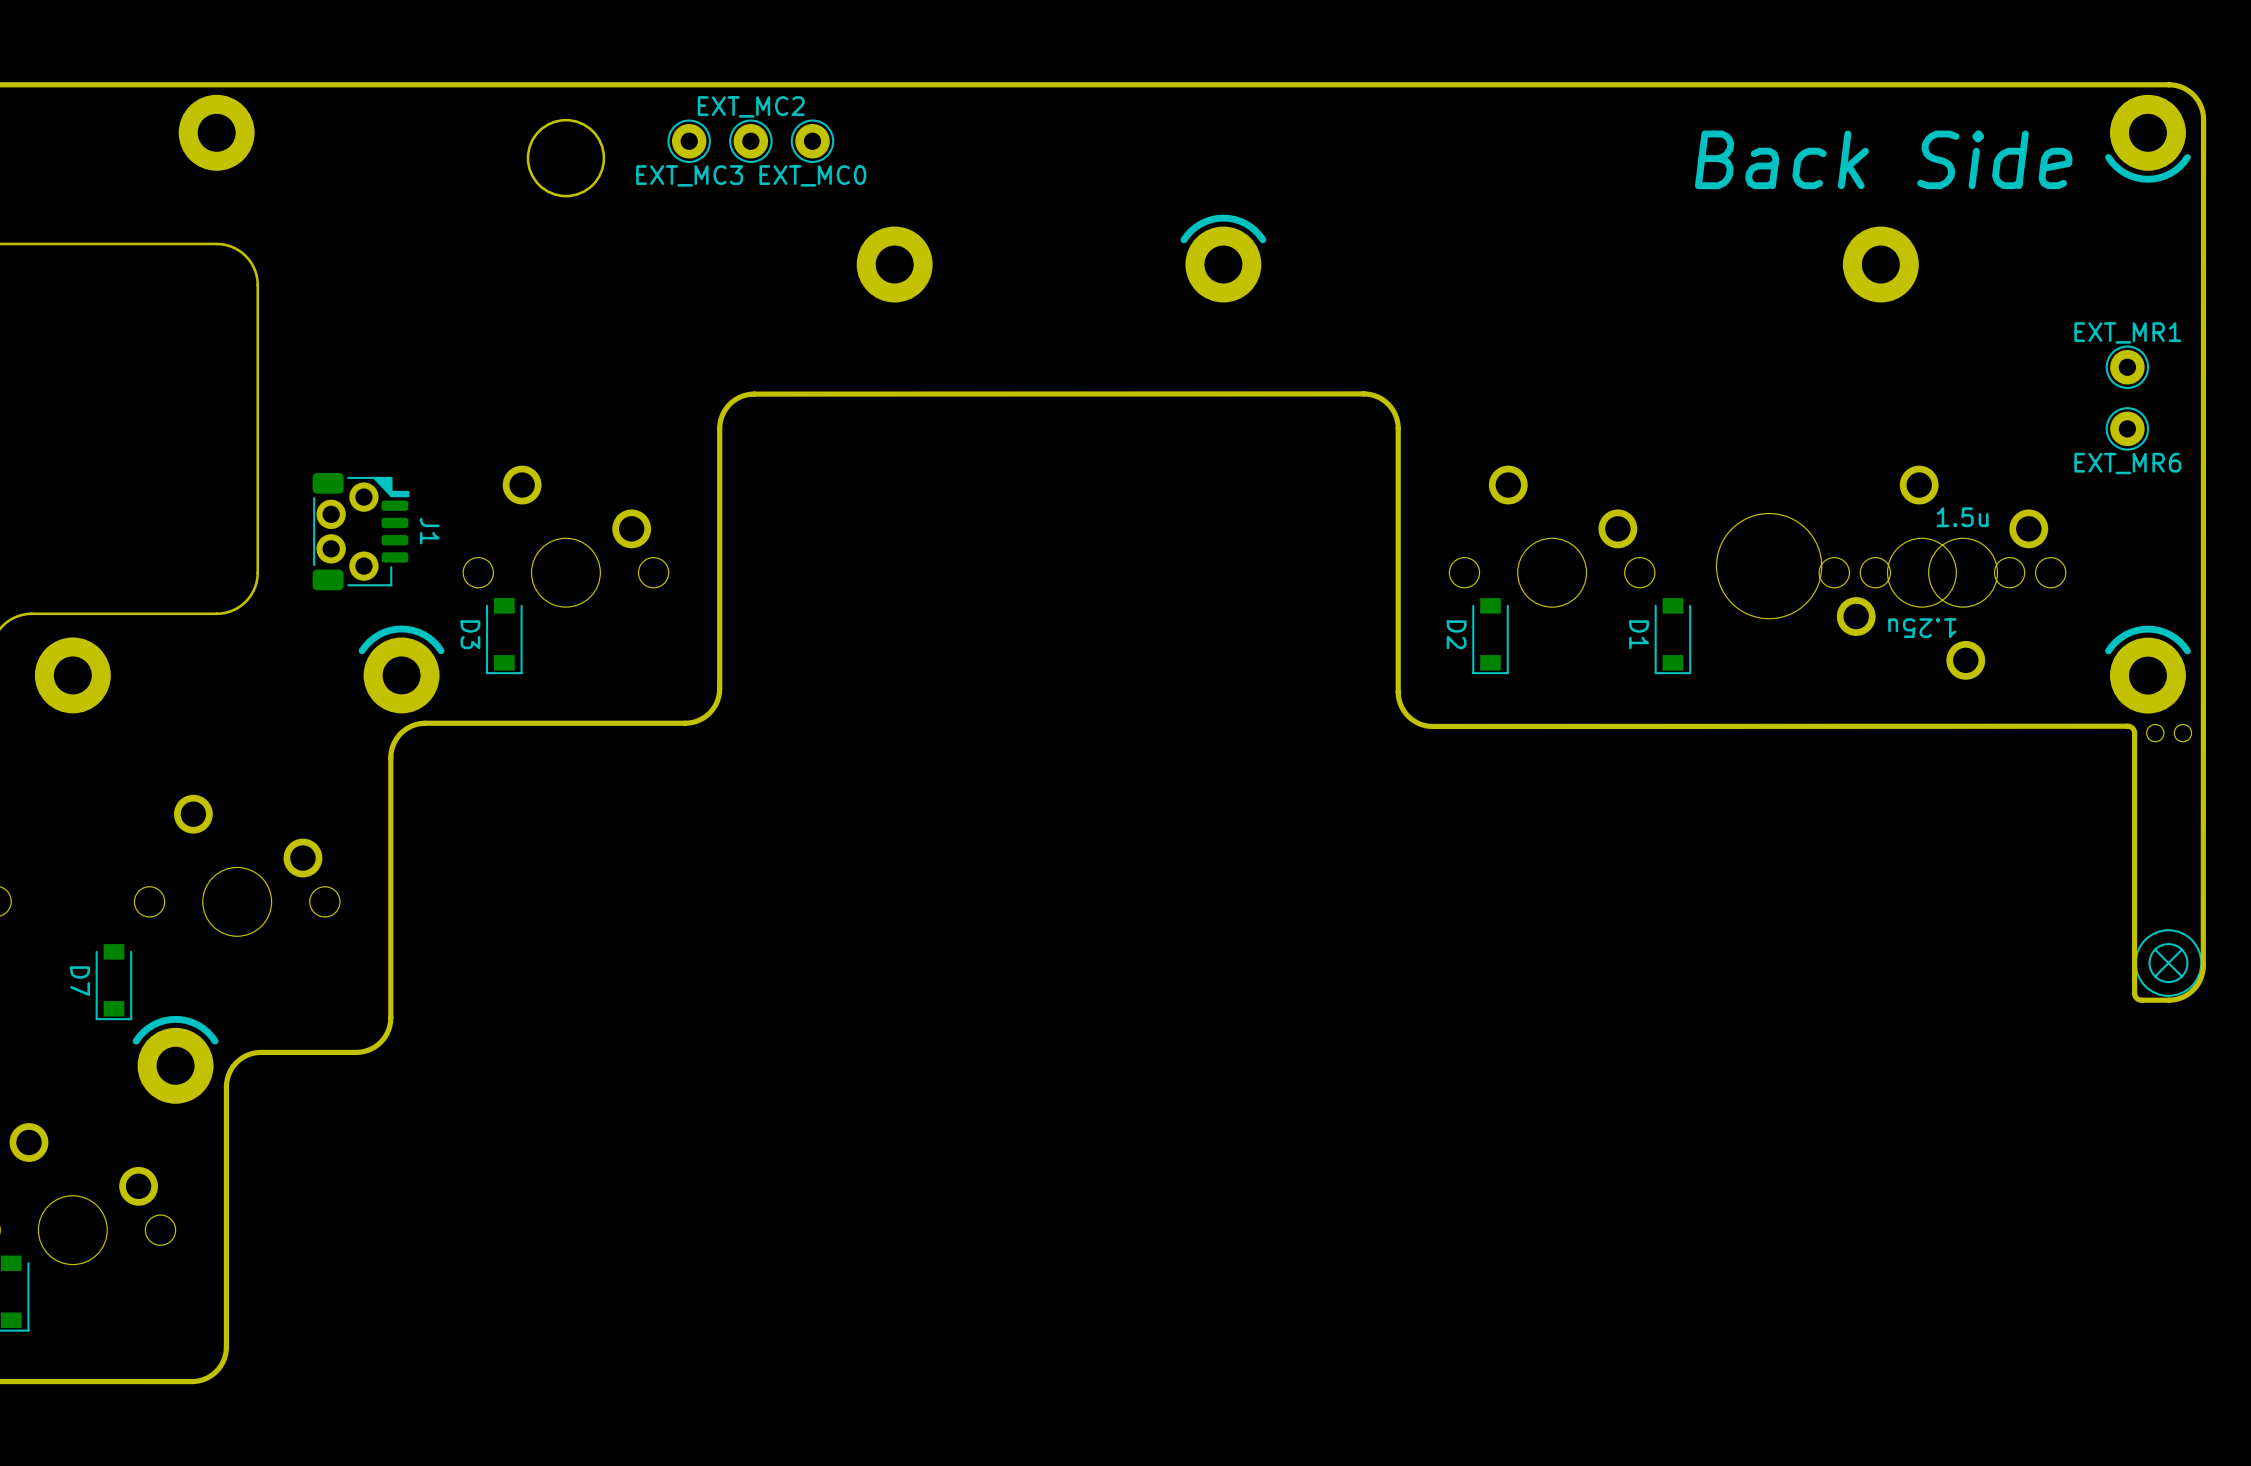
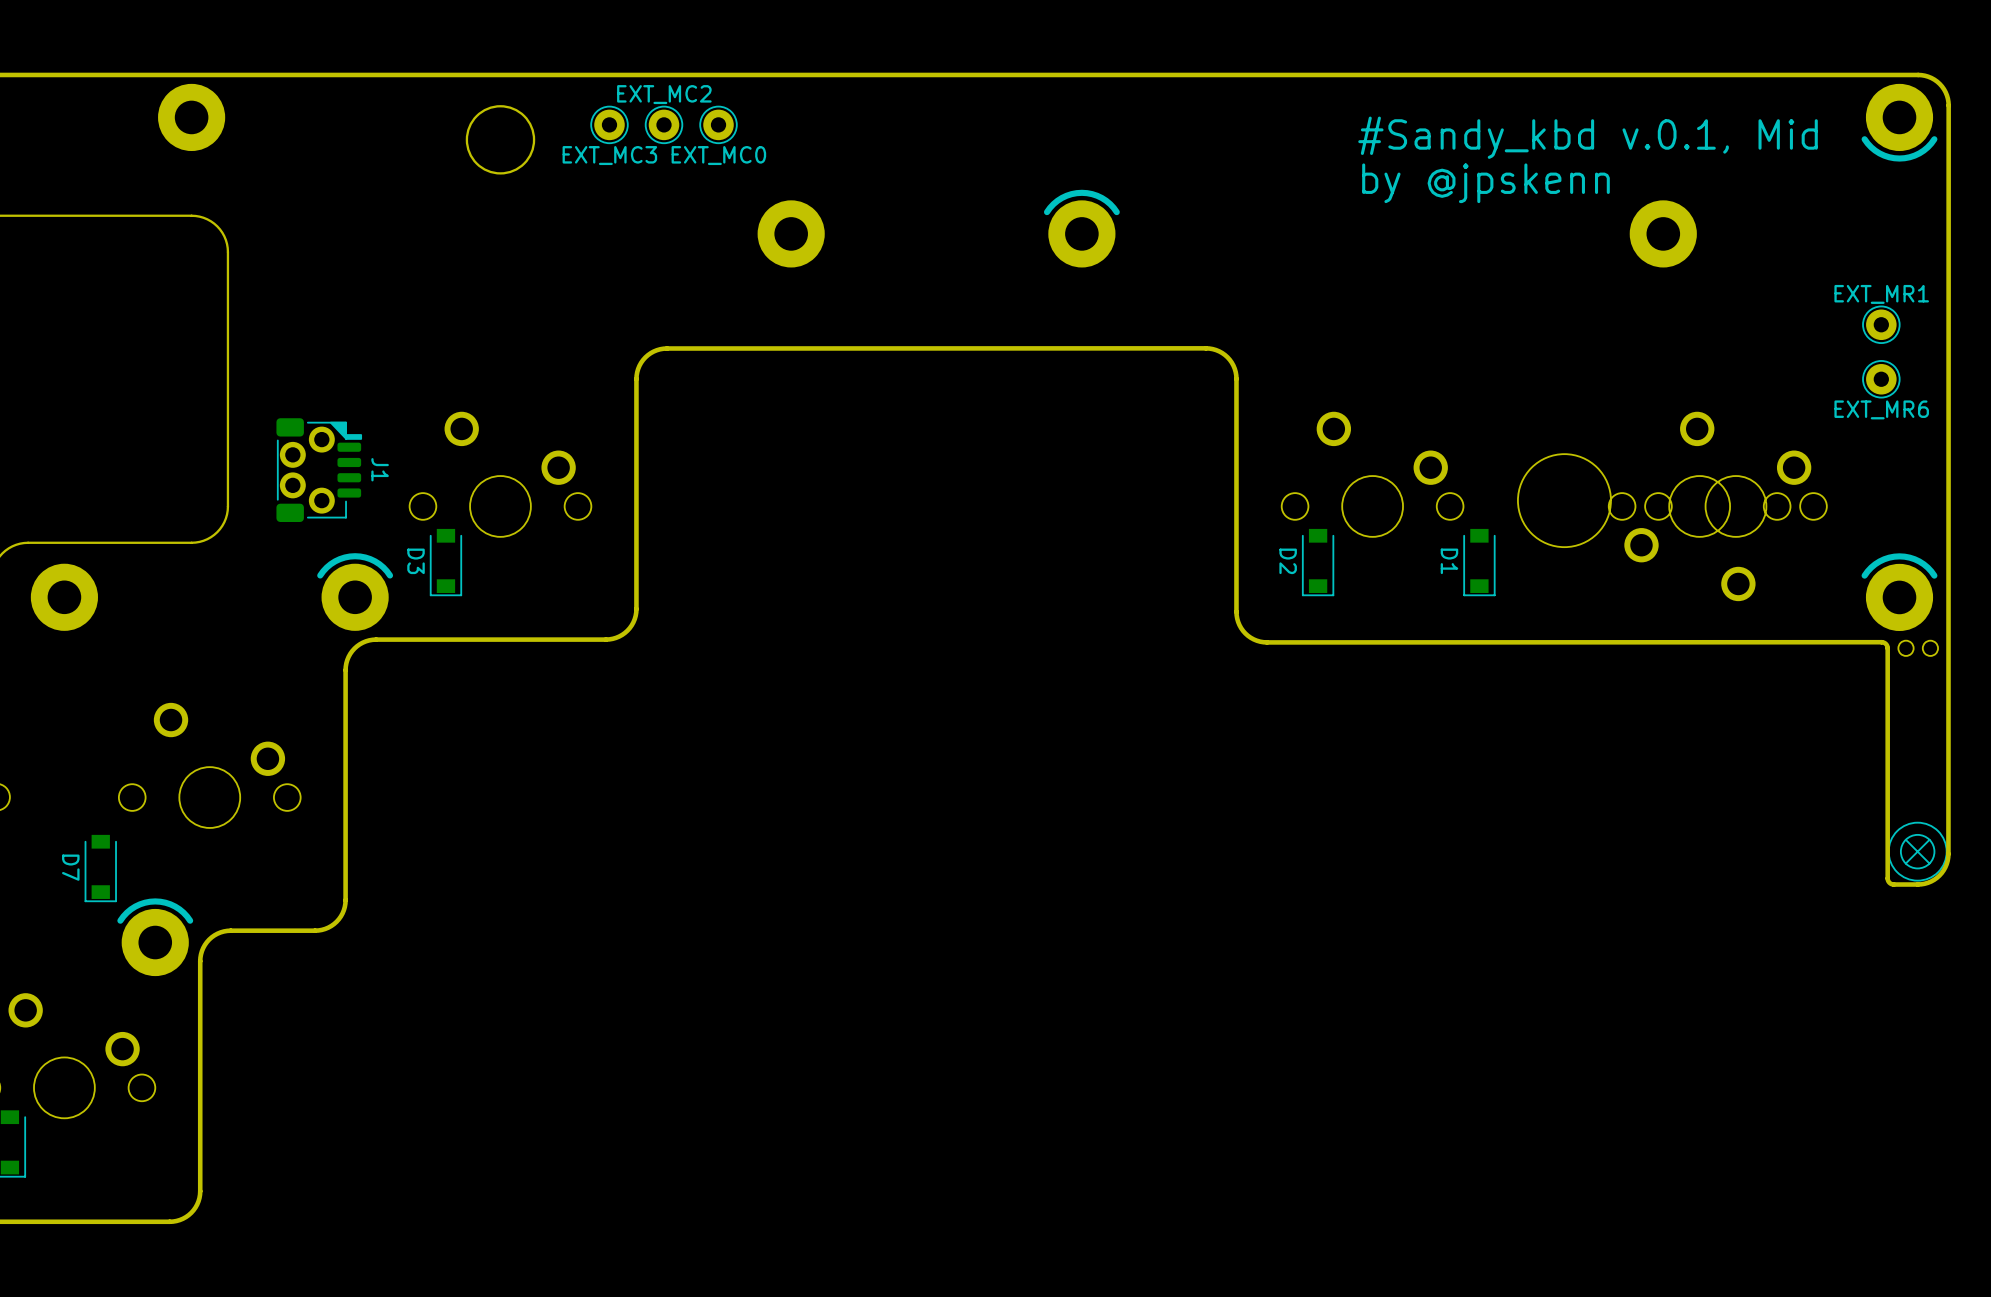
text: none -> #Sandy_kbd v.0.1, Mid (1588, 137)
text: Back Side (1883, 159) -> none
text: none -> by @jpskenn (1486, 183)
part text: 1.5u (1962, 517) -> none
part text: 1.25u (1922, 628) -> none

